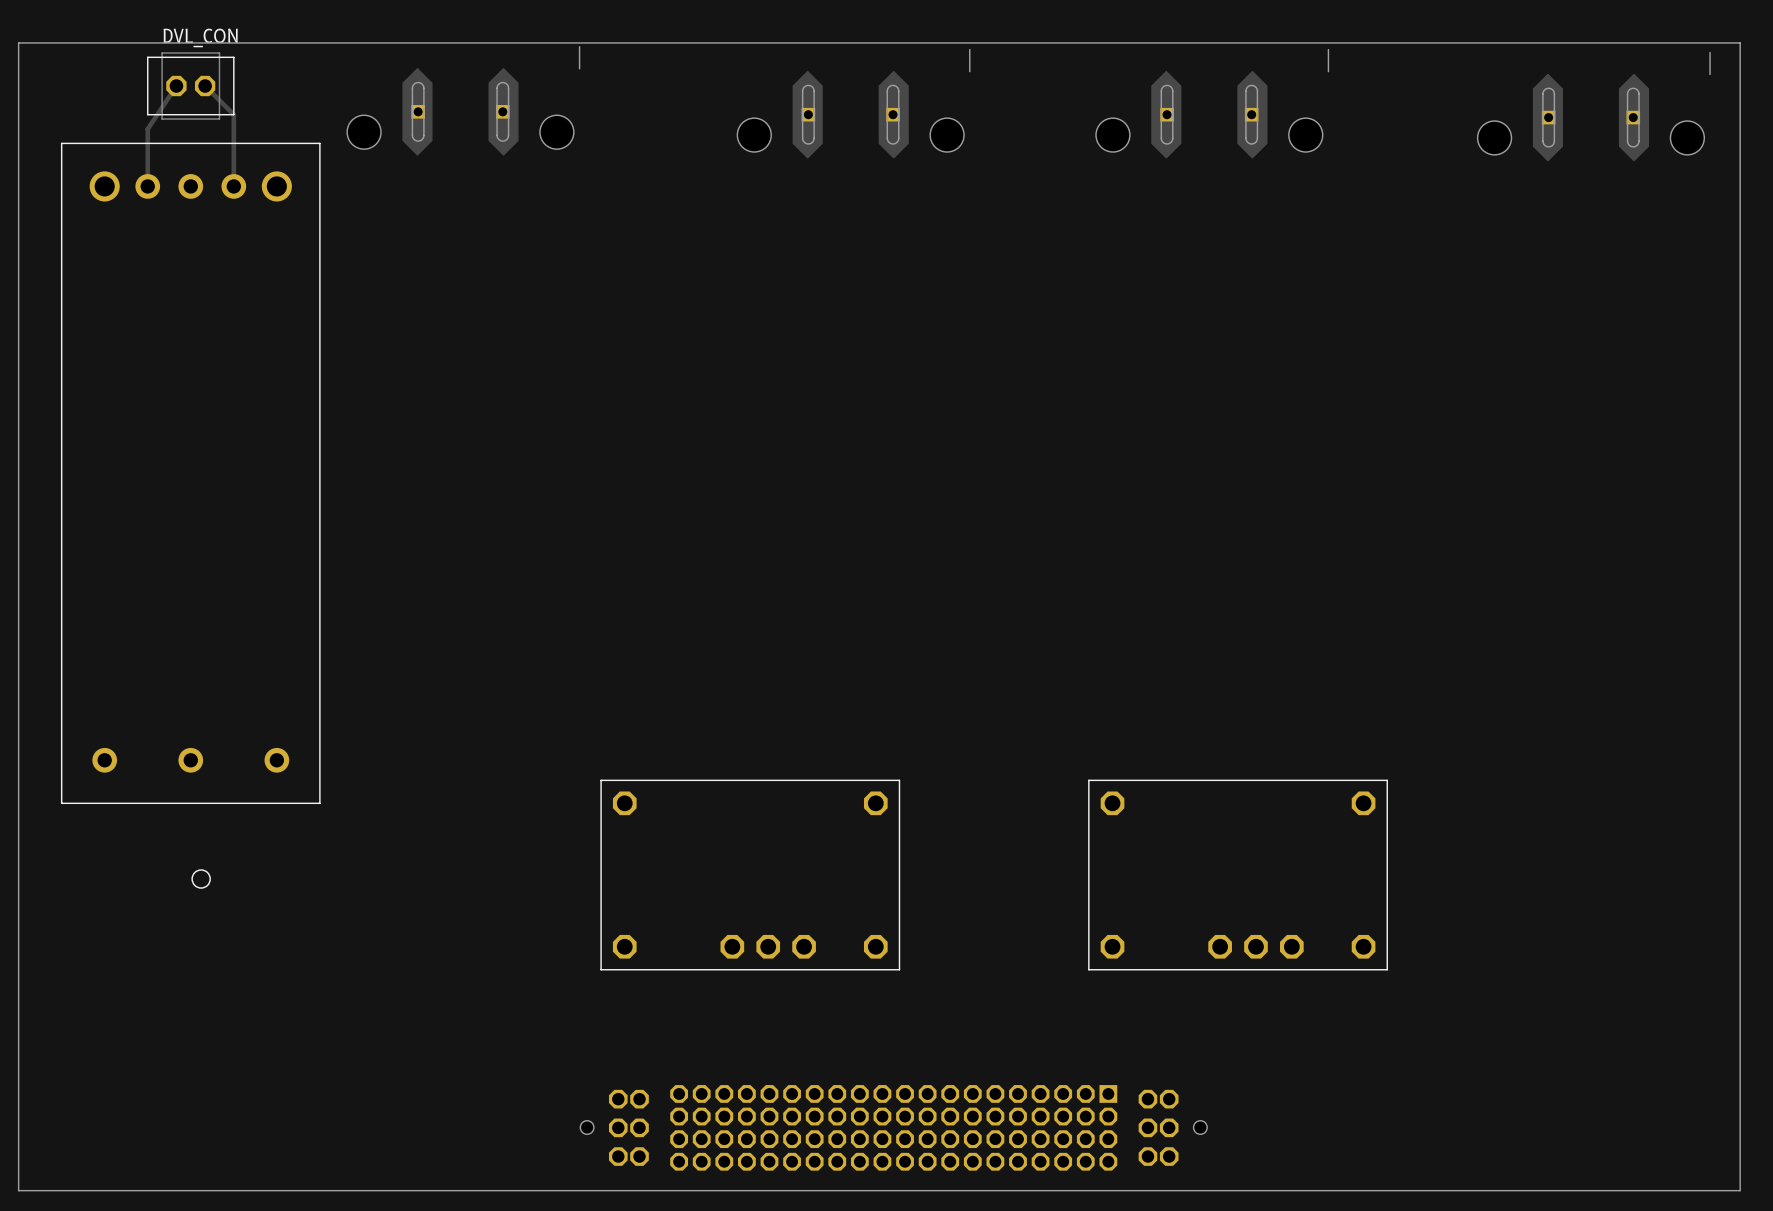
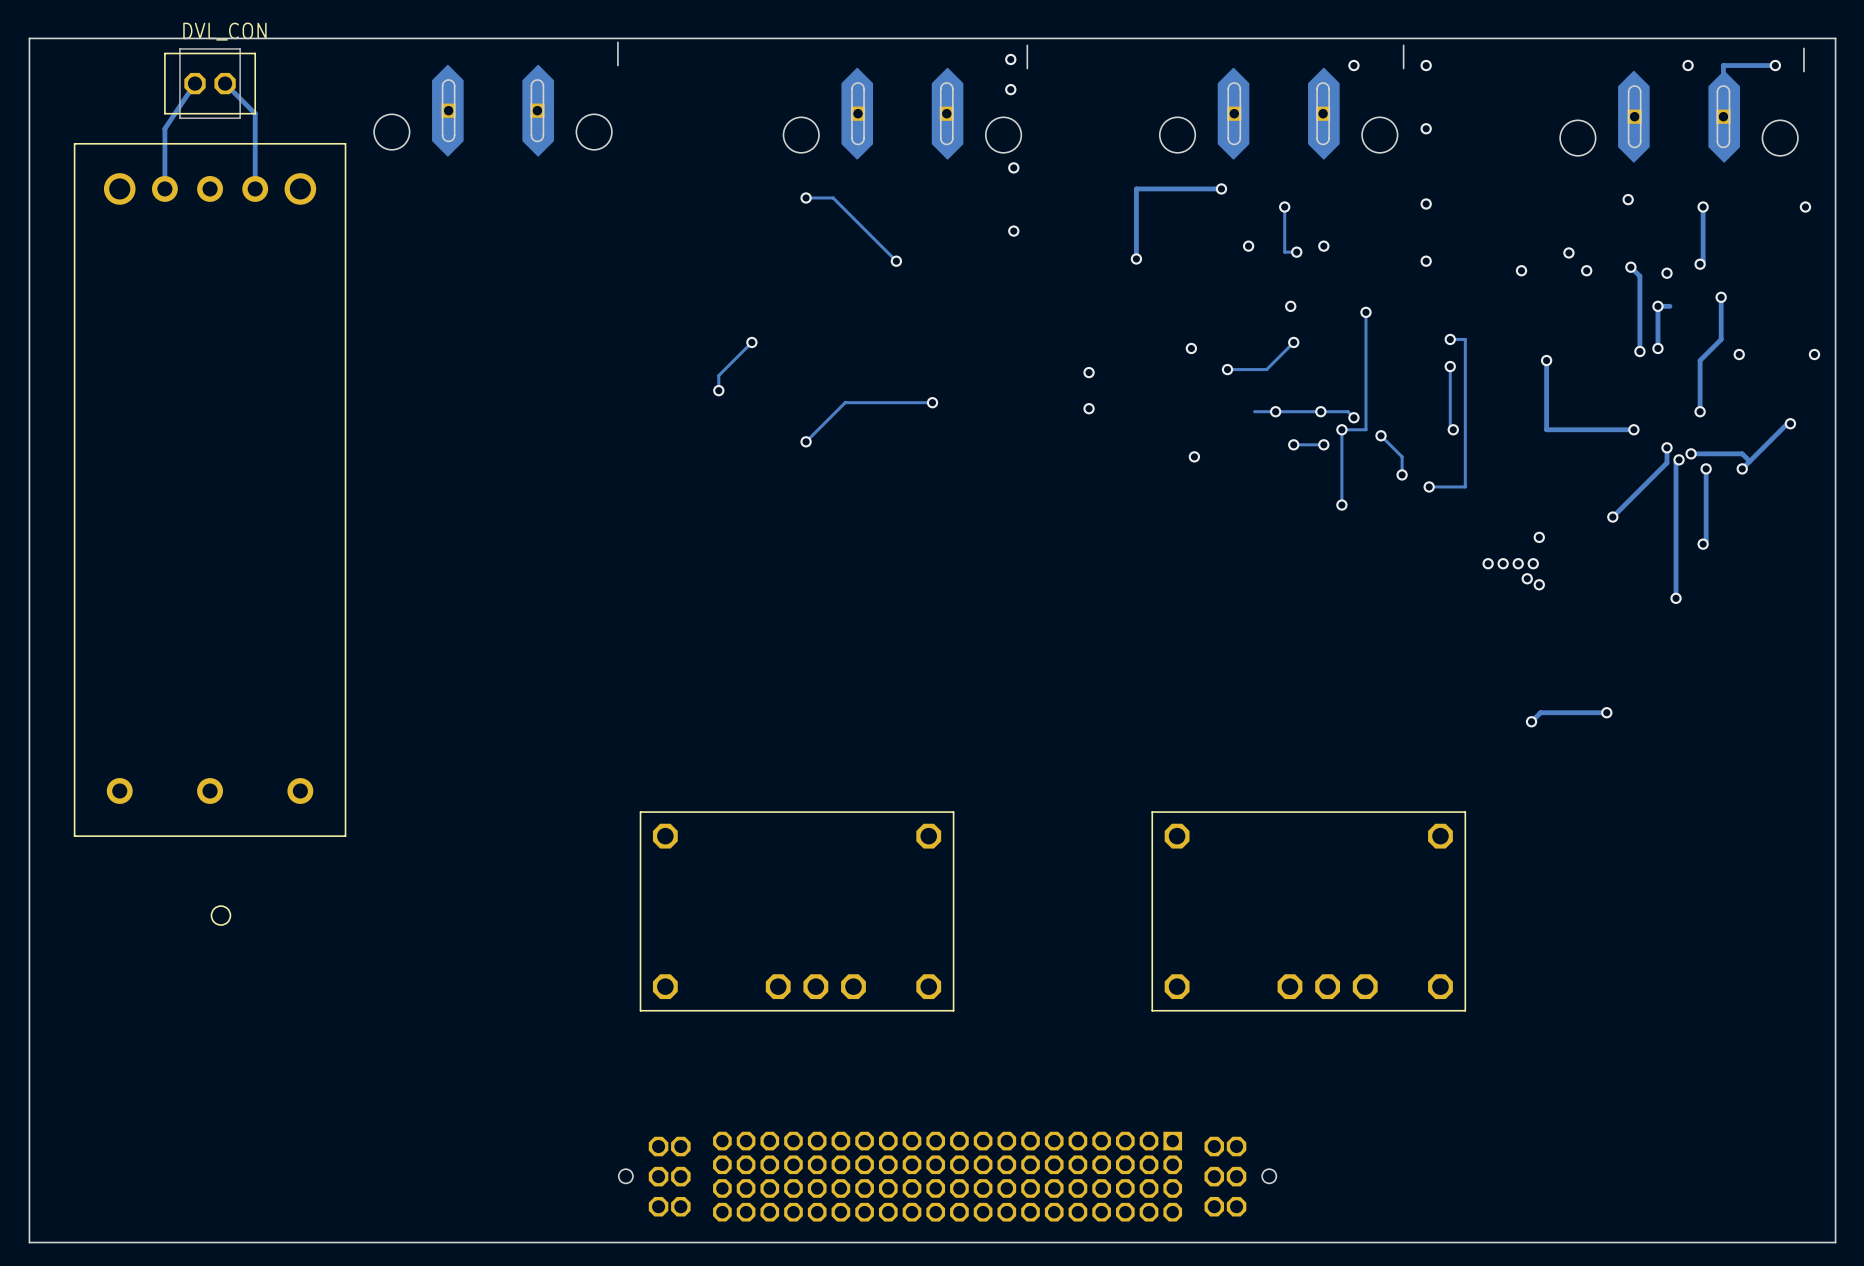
via: none -> (1010, 59)
via: none -> (1353, 65)
via: none -> (1426, 65)
via: none -> (1688, 65)
track: none -> (1775, 65) (1723, 65) (1723, 116)
via: none -> (1775, 65)
via: none -> (1010, 89)
via: none -> (1426, 128)
via: none -> (1013, 167)
track: none -> (1221, 188) (1136, 188) (1136, 258)
via: none -> (1221, 188)
track: none -> (806, 197) (833, 197) (896, 261)
via: none -> (806, 197)
via: none -> (1628, 199)
via: none -> (1426, 204)
track: none -> (1284, 207) (1284, 252) (1296, 252)
via: none -> (1284, 207)
track: none -> (1703, 207) (1703, 261) (1700, 264)
via: none -> (1703, 207)
via: none -> (1805, 207)
via: none -> (1013, 231)
via: none -> (1248, 246)
via: none -> (1323, 246)
via: none -> (1296, 252)
via: none -> (1568, 252)
via: none -> (1136, 258)
via: none -> (896, 261)
via: none -> (1426, 261)
via: none -> (1700, 264)
track: none -> (1630, 267) (1639, 276) (1639, 351)
via: none -> (1630, 267)
via: none -> (1521, 270)
via: none -> (1586, 270)
via: none -> (1667, 273)
track: none -> (1721, 297) (1721, 339) (1700, 360) (1700, 411)
via: none -> (1721, 297)
via: none -> (1290, 306)
via: none -> (1657, 306)
track: none -> (1670, 306) (1657, 306) (1657, 348)
track: none -> (1365, 312) (1365, 429) (1341, 429) (1341, 505)
via: none -> (1365, 312)
track: none -> (1450, 339) (1465, 339) (1465, 486) (1429, 486)
via: none -> (1450, 339)
track: none -> (751, 342) (718, 375) (718, 390)
via: none -> (751, 342)
track: none -> (1293, 342) (1266, 369) (1227, 369)
via: none -> (1293, 342)
via: none -> (1191, 348)
via: none -> (1657, 348)
via: none -> (1639, 351)
via: none -> (1739, 354)
via: none -> (1814, 354)
track: none -> (1546, 360) (1546, 429) (1633, 429)
via: none -> (1546, 360)
track: none -> (1450, 366) (1450, 429) (1453, 429)
via: none -> (1450, 366)
via: none -> (1227, 369)
via: none -> (1089, 372)
via: none -> (718, 390)
track: none -> (932, 402) (845, 402) (806, 441)
via: none -> (932, 402)
via: none -> (1089, 408)
track: none -> (1254, 411) (1347, 411) (1353, 417)
via: none -> (1275, 411)
via: none -> (1320, 411)
via: none -> (1700, 411)
via: none -> (1353, 417)
track: none -> (1790, 423) (1787, 423) (1742, 468)
via: none -> (1790, 423)
via: none -> (1341, 429)
via: none -> (1453, 429)
via: none -> (1633, 429)
track: none -> (1381, 435) (1402, 456) (1402, 474)
via: none -> (1381, 435)
via: none -> (806, 441)
via: none -> (1293, 444)
track: none -> (1323, 444) (1293, 444)
via: none -> (1323, 444)
track: none -> (1667, 447) (1667, 462) (1612, 517)
via: none -> (1667, 447)
track: none -> (1691, 453) (1742, 453) (1749, 461)
via: none -> (1691, 453)
via: none -> (1194, 456)
track: none -> (1679, 459) (1676, 462) (1676, 598)
via: none -> (1679, 459)
track: none -> (1706, 468) (1706, 541) (1703, 544)
via: none -> (1706, 468)
via: none -> (1742, 468)
via: none -> (1402, 474)
via: none -> (1429, 486)
via: none -> (1341, 505)
via: none -> (1612, 517)
via: none -> (1539, 537)
via: none -> (1703, 544)
via: none -> (1488, 563)
via: none -> (1503, 563)
via: none -> (1518, 563)
via: none -> (1533, 563)
via: none -> (1527, 578)
via: none -> (1539, 584)
via: none -> (1676, 598)
track: none -> (1606, 712) (1540, 712) (1531, 721)
via: none -> (1606, 712)
via: none -> (1531, 721)

